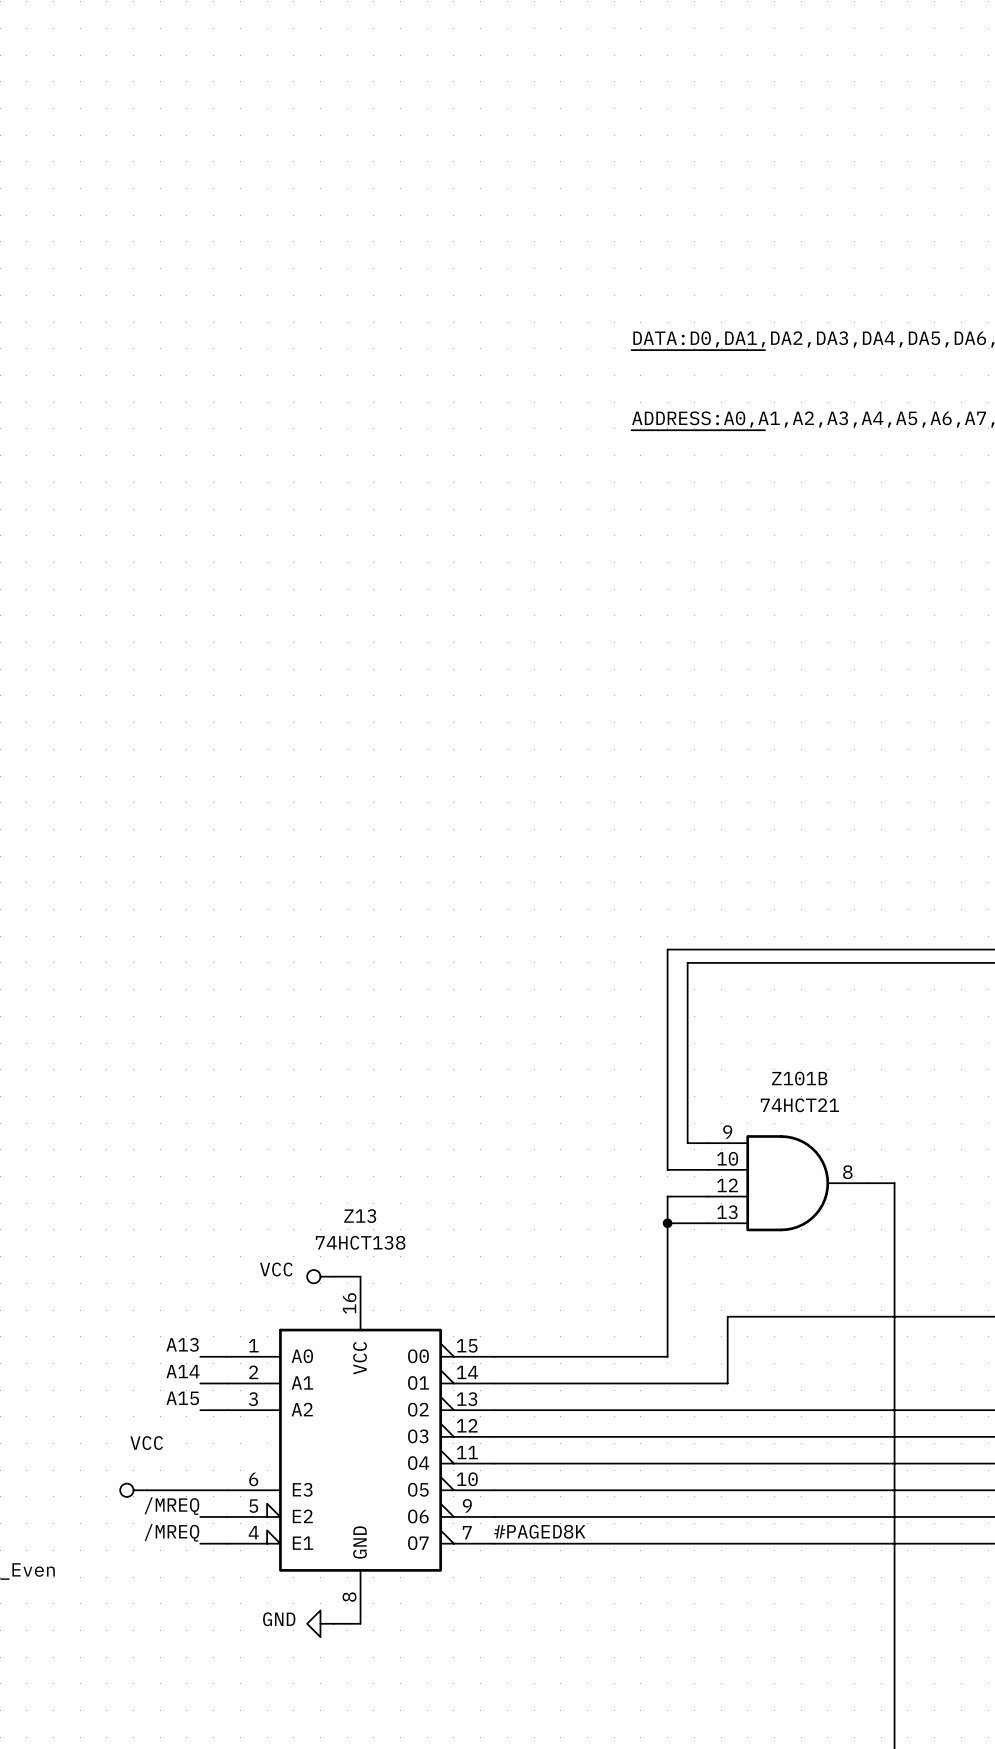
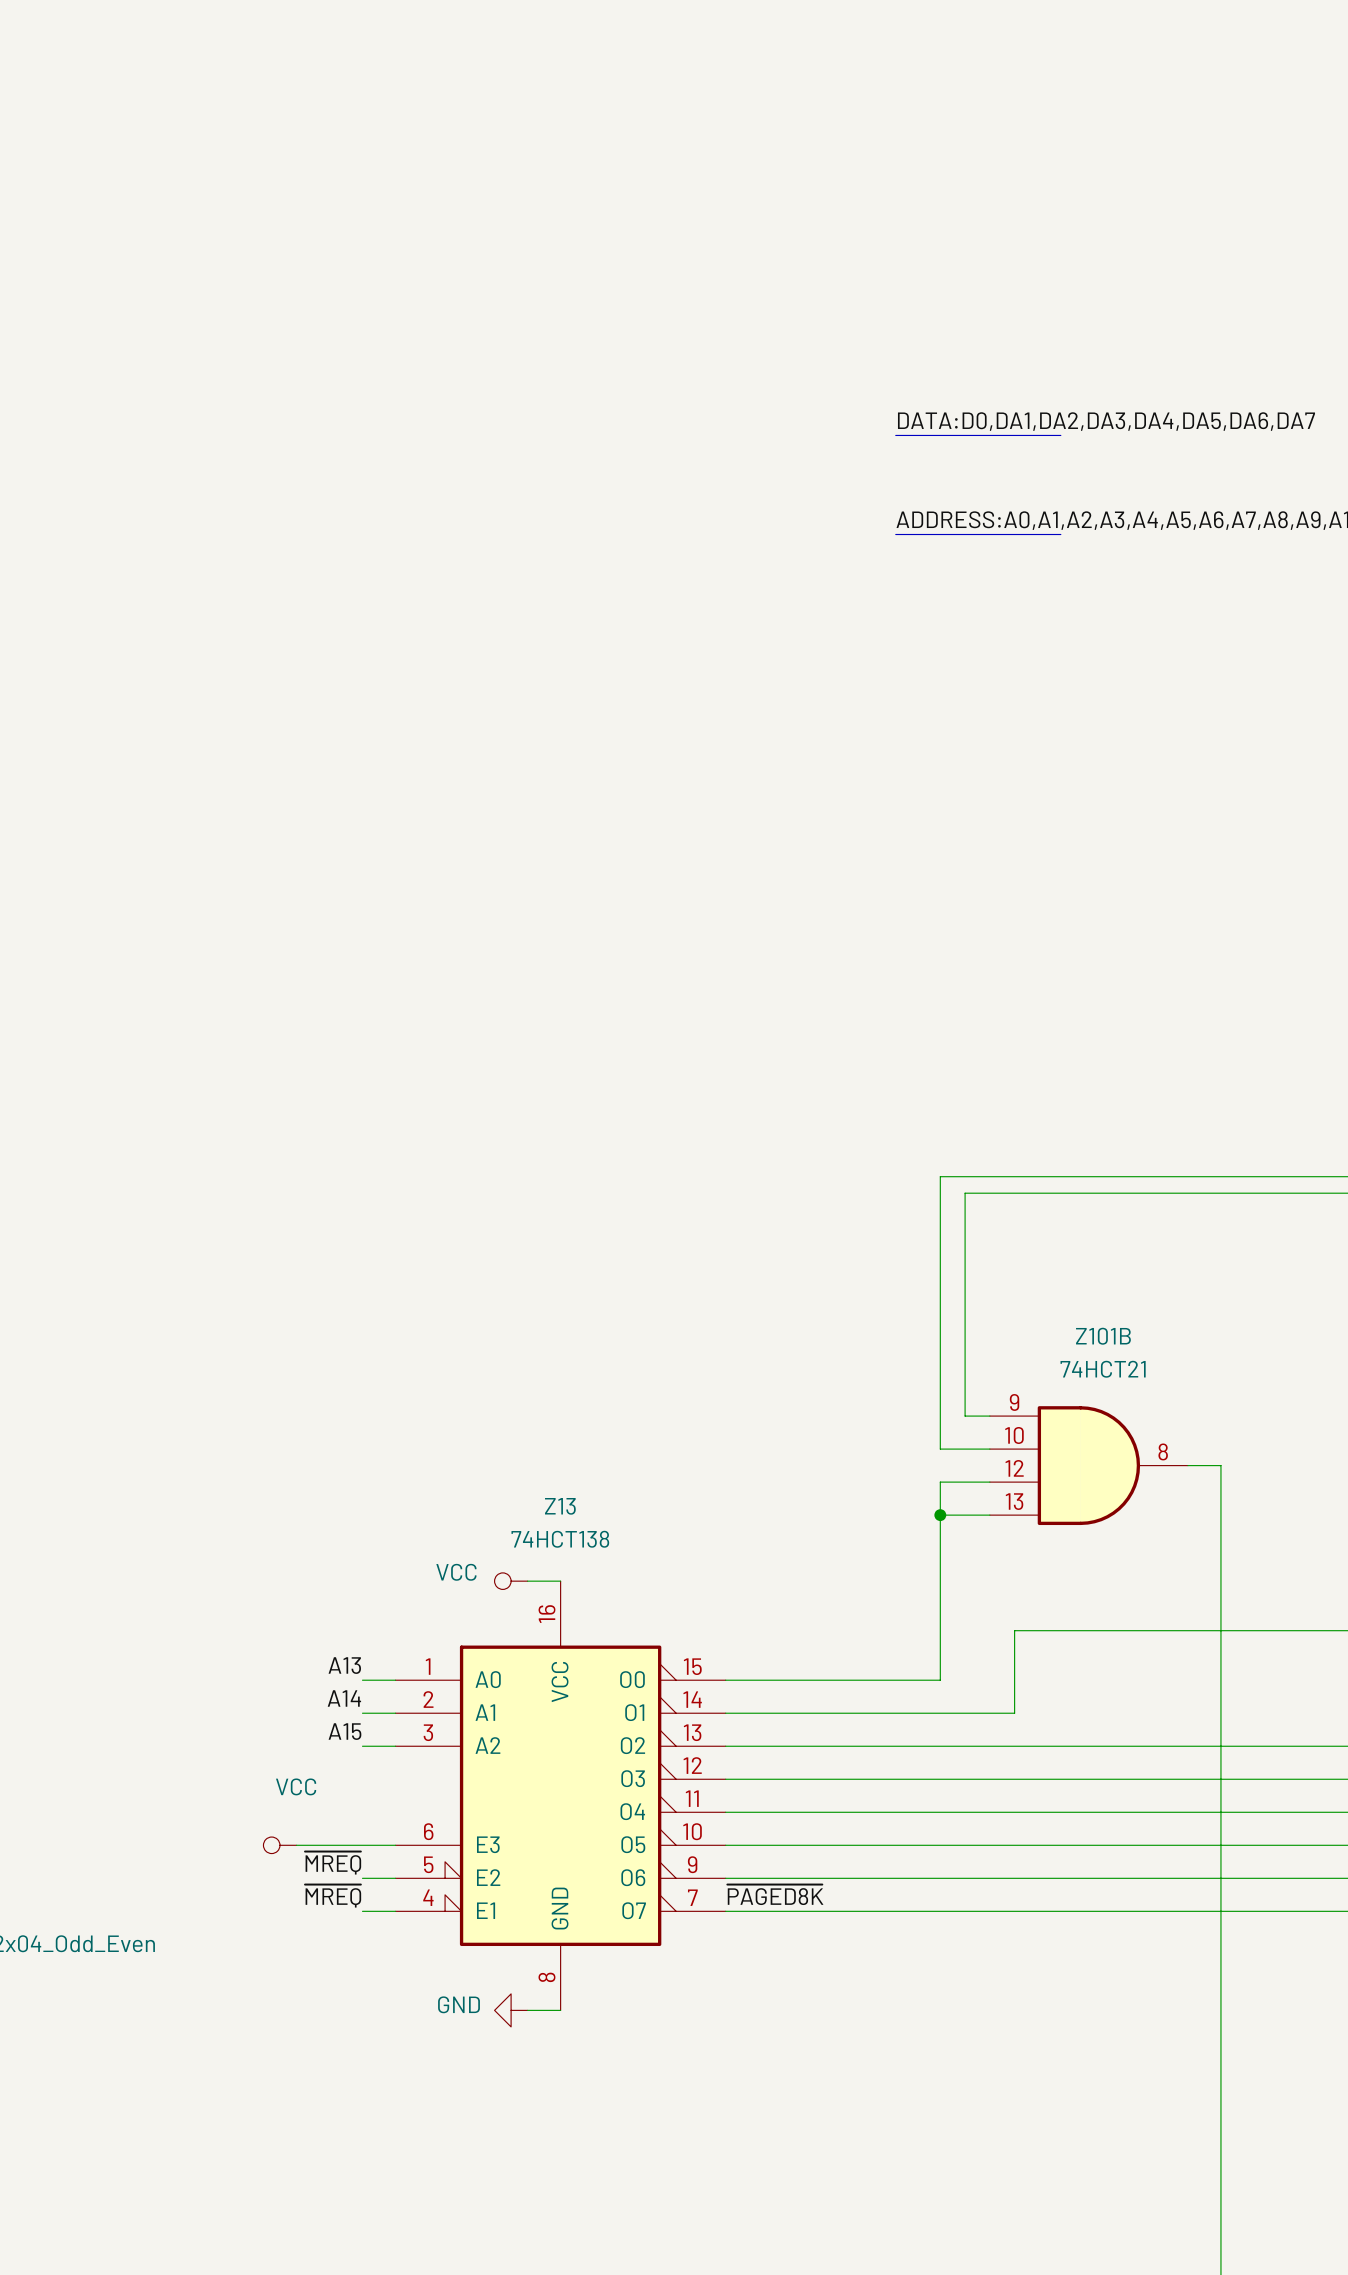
label: /MREQ (171, 1506) -> ~{MREQ} (333, 1863)
label: #PAGED8K (539, 1531) -> ~{PAGED8K} (775, 1894)
label: /MREQ (171, 1532) -> ~{MREQ} (333, 1896)

